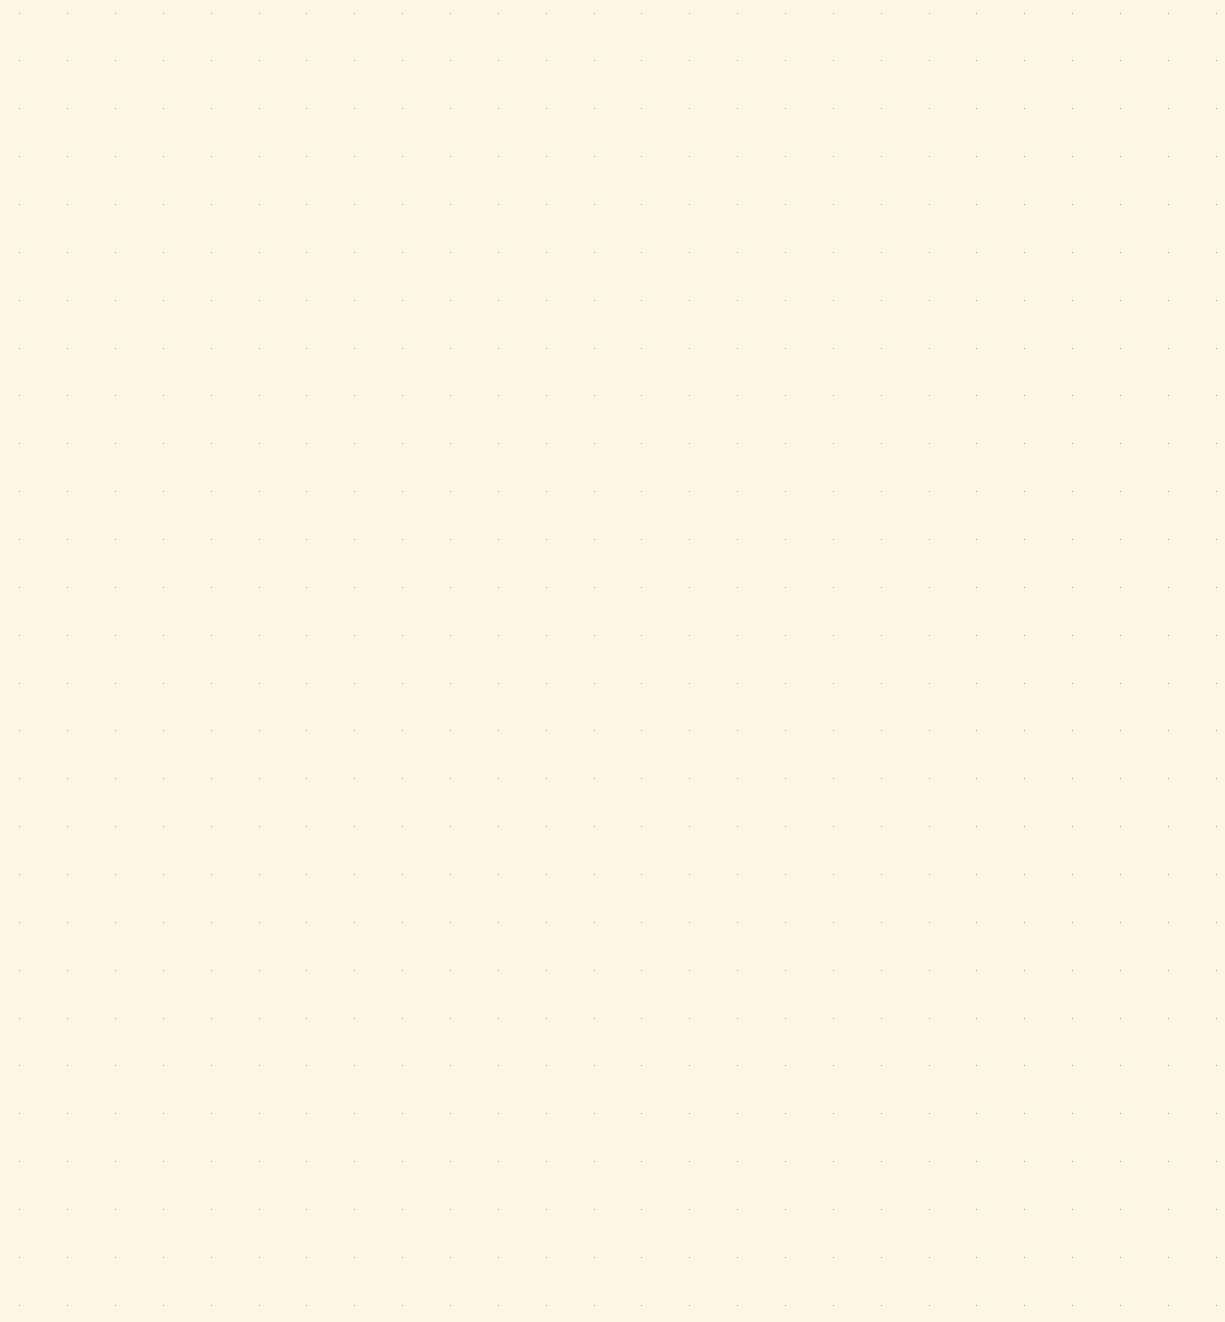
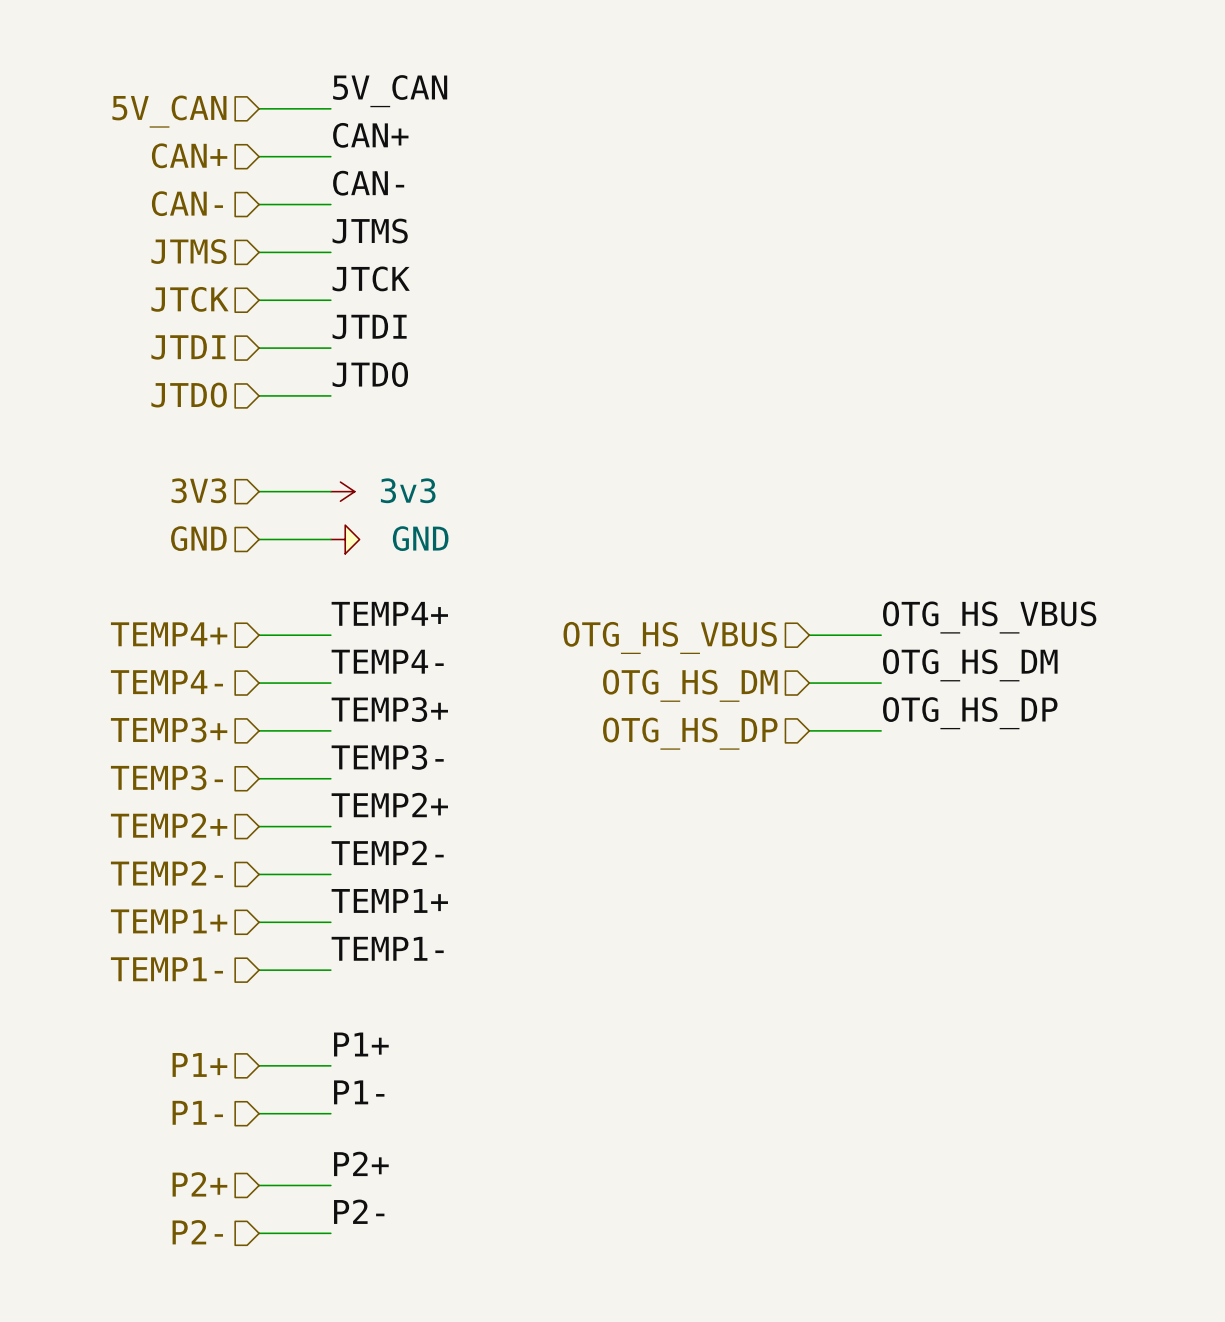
label: none -> 5V_CAN (390, 91)
wire: none -> (259, 108) (330, 108)
hierarchical label: none -> 5V_CAN (169, 111)
label: none -> CAN+ (370, 135)
hierarchical label: none -> CAN+ (189, 155)
wire: none -> (259, 156) (330, 156)
label: none -> CAN- (368, 183)
hierarchical label: none -> CAN- (187, 203)
wire: none -> (259, 204) (330, 204)
label: none -> JTMS (370, 231)
hierarchical label: none -> JTMS (188, 251)
wire: none -> (259, 252) (330, 252)
label: none -> JTCK (371, 278)
hierarchical label: none -> JTCK (190, 299)
wire: none -> (259, 300) (330, 300)
label: none -> JTDI (369, 326)
hierarchical label: none -> JTDI (188, 347)
wire: none -> (259, 348) (330, 348)
label: none -> JTDO (370, 374)
hierarchical label: none -> JTDO (189, 395)
wire: none -> (259, 395) (330, 395)
hierarchical label: none -> 3V3 (198, 490)
wire: none -> (259, 491) (330, 491)
power symbol: none -> 3v3 (342, 491)
hierarchical label: none -> GND (198, 538)
wire: none -> (259, 539) (330, 539)
power symbol: none -> GND (345, 539)
label: none -> TEMP4+ (389, 613)
label: none -> OTG_HS_VBUS (989, 617)
hierarchical label: none -> TEMP4+ (169, 634)
wire: none -> (259, 635) (330, 635)
wire: none -> (809, 635) (881, 635)
hierarchical label: none -> OTG_HS_VBUS (670, 637)
label: none -> TEMP4- (387, 661)
label: none -> OTG_HS_DM (970, 665)
hierarchical label: none -> TEMP4- (166, 682)
wire: none -> (259, 683) (330, 683)
wire: none -> (809, 683) (881, 683)
hierarchical label: none -> OTG_HS_DM (690, 685)
label: none -> TEMP3+ (389, 709)
label: none -> OTG_HS_DP (970, 713)
hierarchical label: none -> TEMP3+ (169, 730)
wire: none -> (259, 730) (330, 730)
wire: none -> (809, 730) (881, 730)
hierarchical label: none -> OTG_HS_DP (690, 733)
label: none -> TEMP3- (387, 757)
hierarchical label: none -> TEMP3- (166, 777)
wire: none -> (259, 778) (330, 778)
label: none -> TEMP2+ (389, 805)
hierarchical label: none -> TEMP2+ (169, 825)
wire: none -> (259, 826) (330, 826)
label: none -> TEMP2- (387, 852)
hierarchical label: none -> TEMP2- (166, 873)
wire: none -> (259, 874) (330, 874)
label: none -> TEMP1+ (389, 900)
hierarchical label: none -> TEMP1+ (169, 921)
wire: none -> (259, 922) (330, 922)
label: none -> TEMP1- (387, 948)
hierarchical label: none -> TEMP1- (166, 969)
wire: none -> (259, 970) (330, 970)
label: none -> P1+ (361, 1044)
hierarchical label: none -> P1+ (199, 1064)
wire: none -> (259, 1065) (330, 1065)
label: none -> P1- (359, 1092)
hierarchical label: none -> P1- (197, 1112)
wire: none -> (259, 1113) (330, 1113)
label: none -> P2+ (361, 1163)
hierarchical label: none -> P2+ (199, 1184)
wire: none -> (259, 1185) (330, 1185)
label: none -> P2- (359, 1211)
hierarchical label: none -> P2- (197, 1232)
wire: none -> (259, 1233) (330, 1233)

